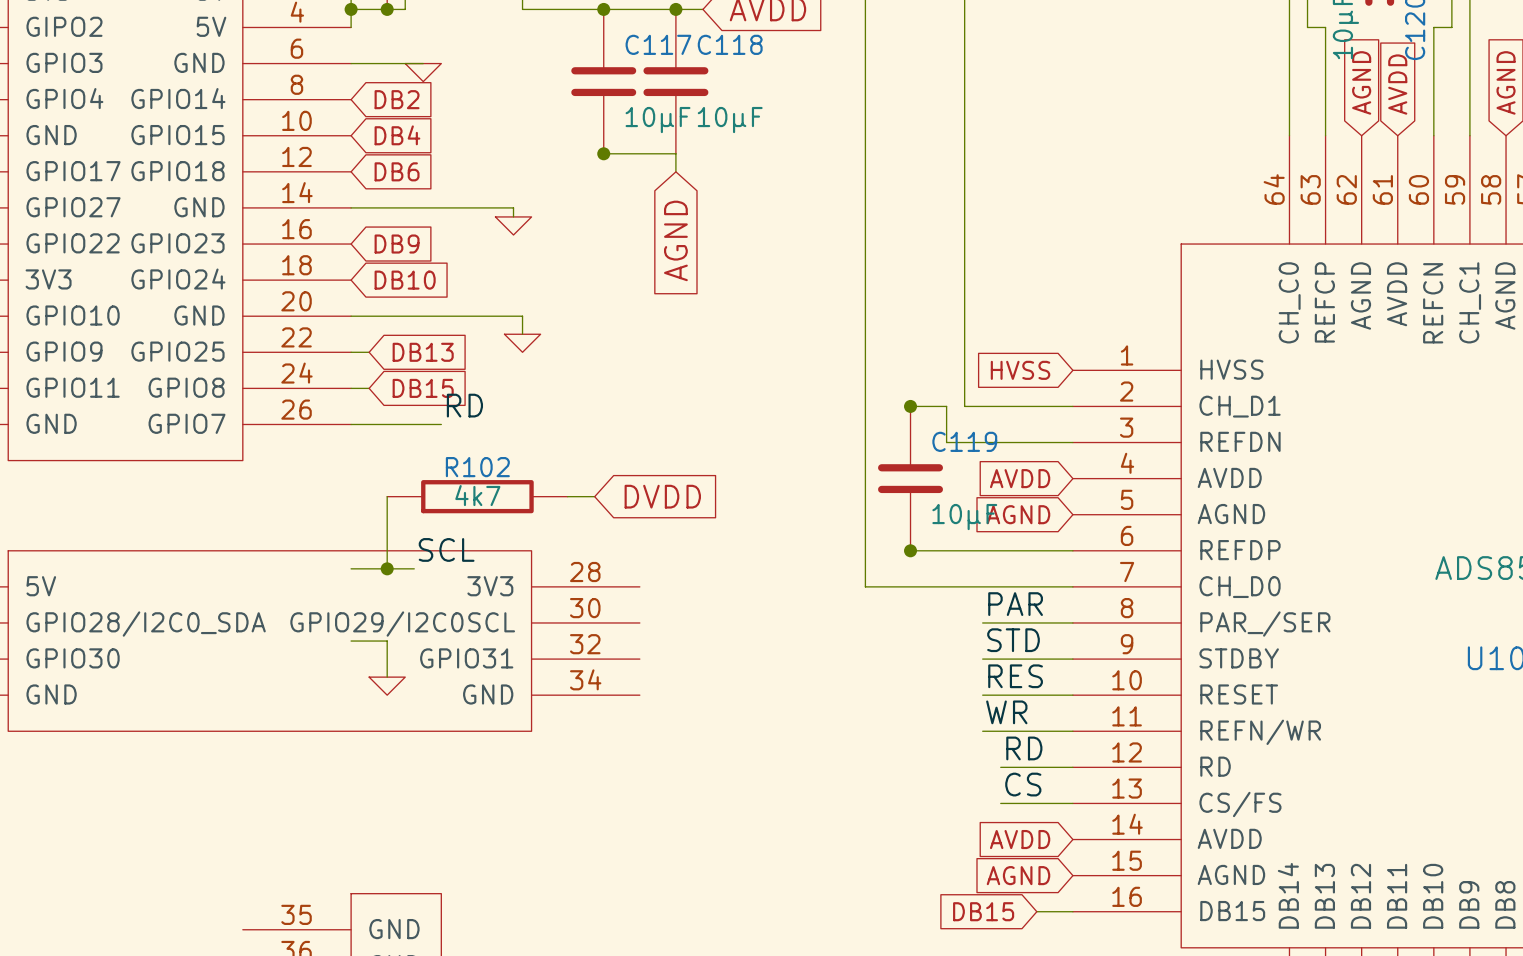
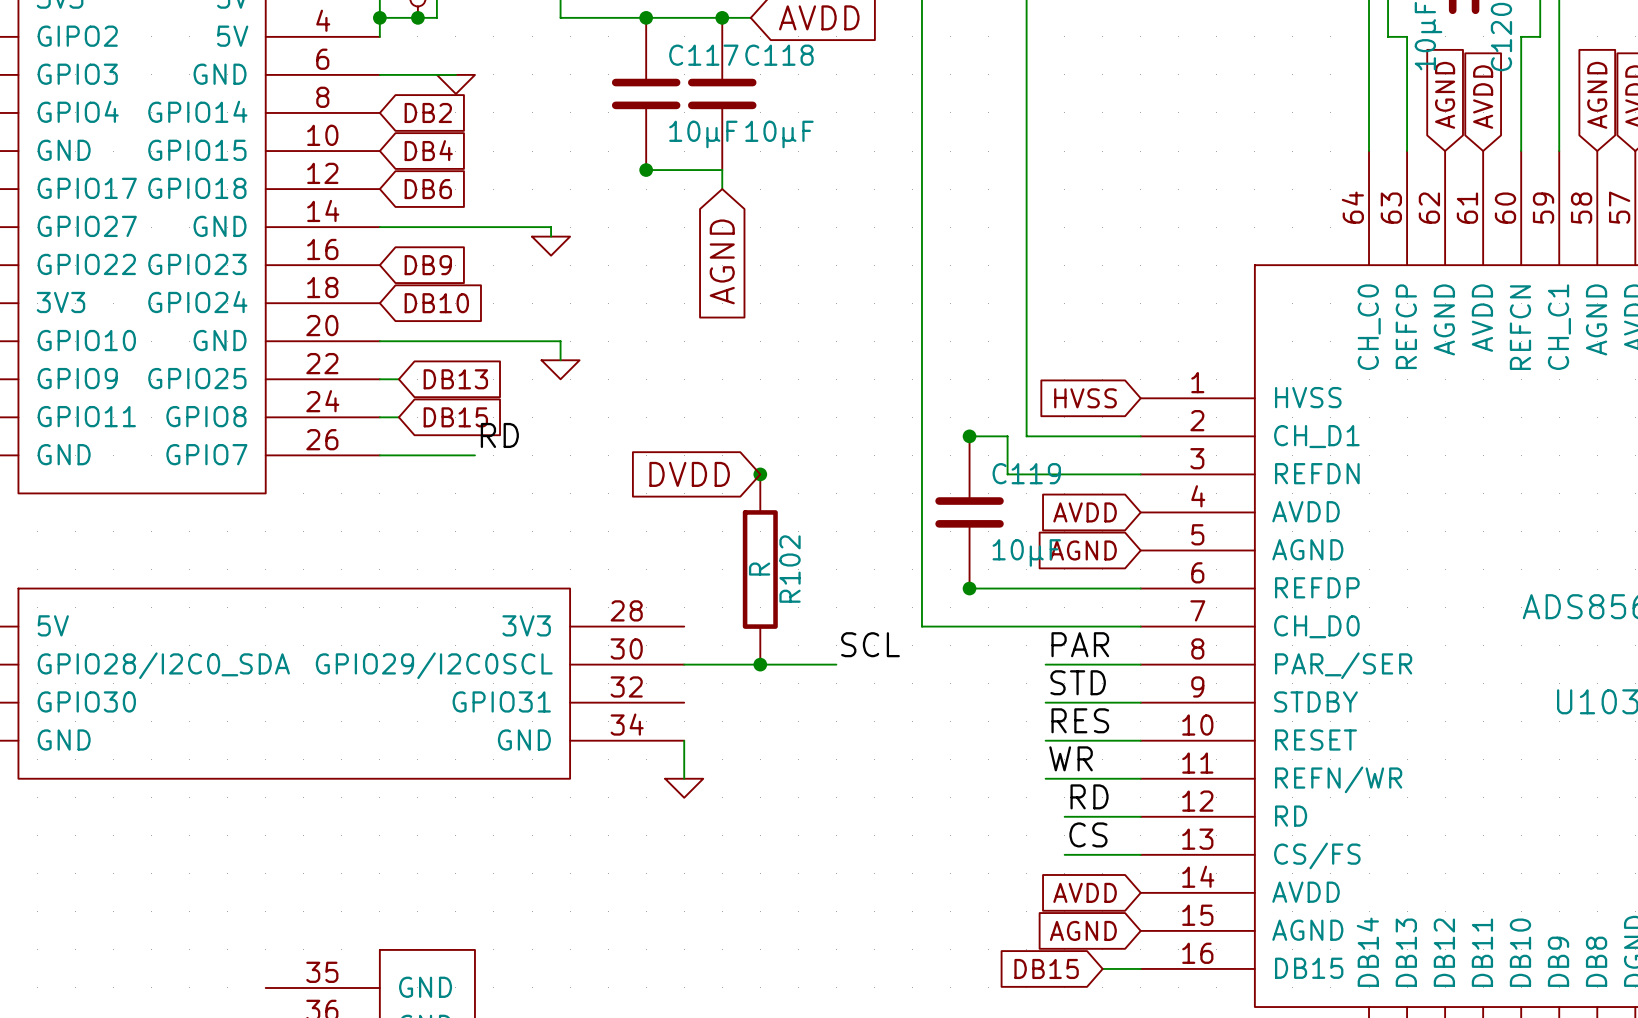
junction: none -> (760, 474)
R102 value: 4k7 (477, 495) -> R (759, 569)
wire: (387, 496) (387, 568) -> none
R102 rotation: 0° (477, 496) -> 90° clockwise (760, 569)
R102 position: (477, 496) -> (760, 569)
wire: (567, 496) (594, 496) -> none
global label rotation: 0° (662, 496) -> 180° (689, 474)
label: SCL (446, 549) -> none
wire: (351, 568) (414, 568) -> none
junction: (387, 568) -> none
label: none -> SCL (870, 644)
wire: none -> (684, 664) (836, 664)
junction: none -> (760, 664)
wire: (351, 641) (387, 641) (387, 677) -> none
power symbol position: (387, 686) -> (684, 788)
wire: none -> (684, 740) (684, 778)

